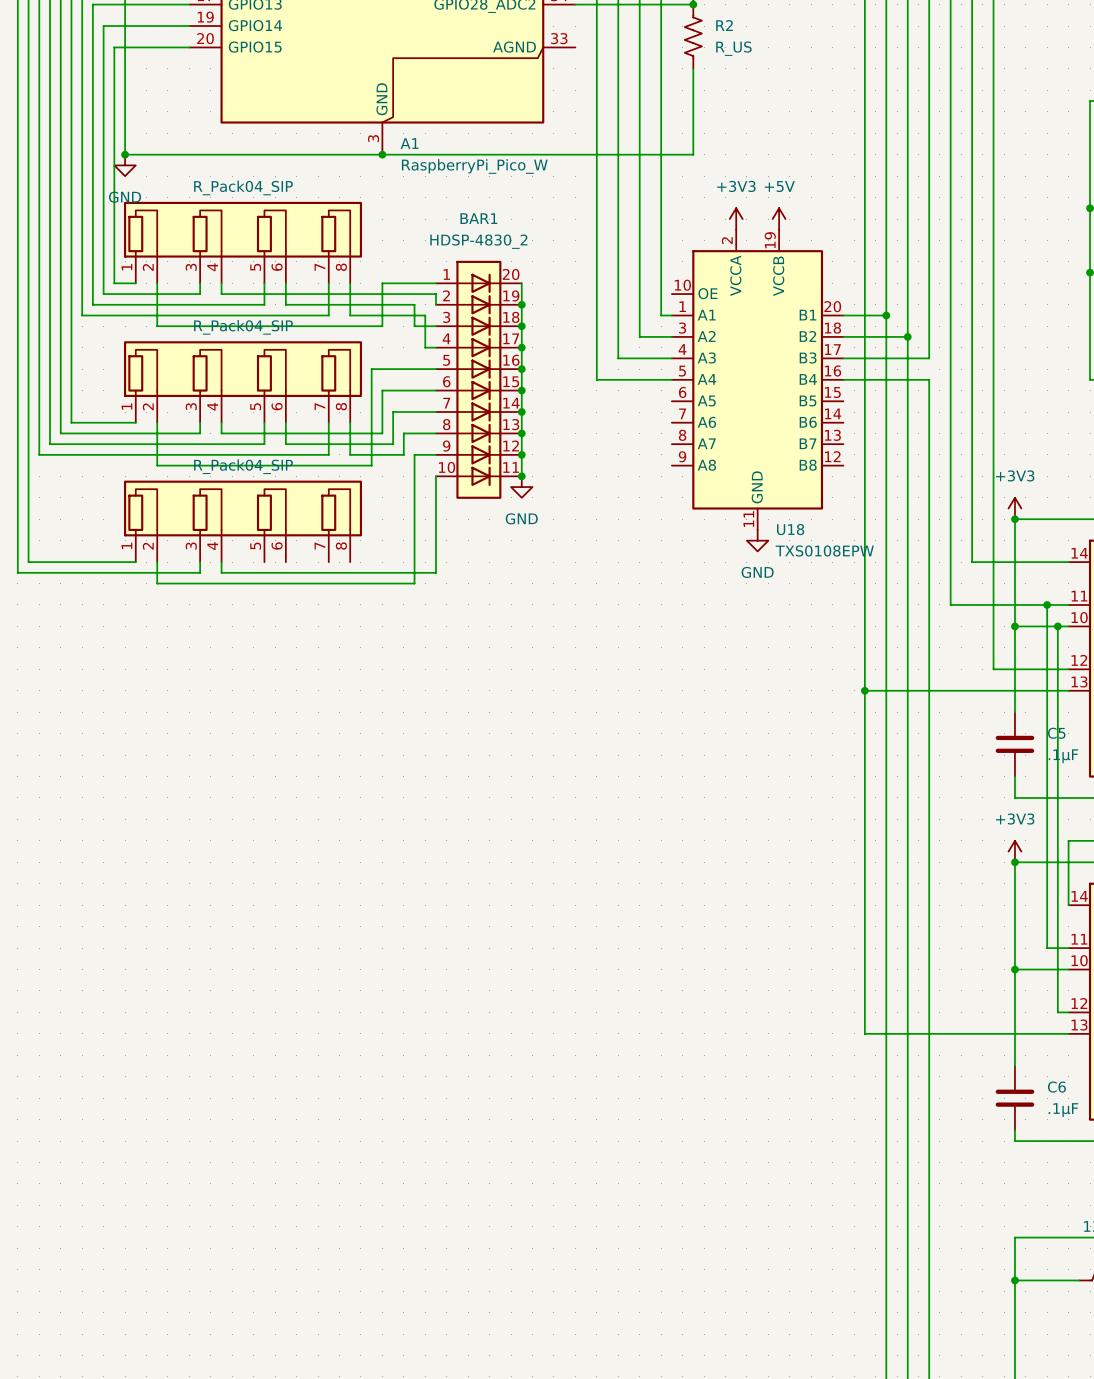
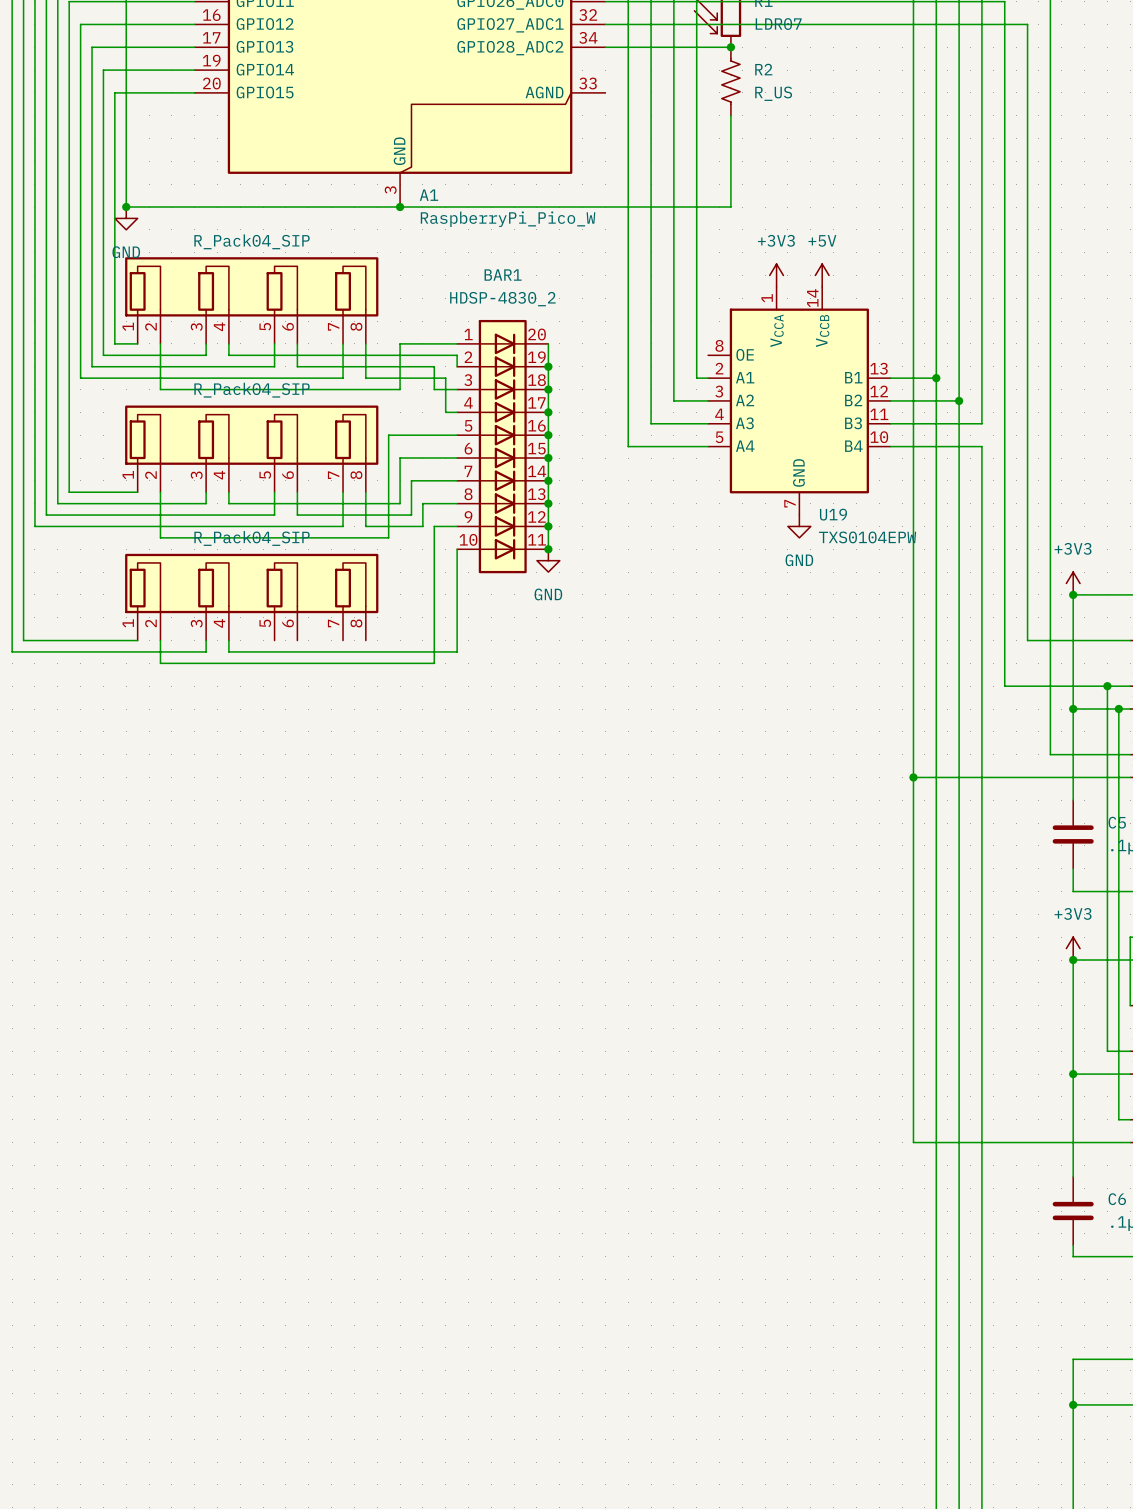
U19: none -> TXS0104EPW (799, 400)
U18: TXS0108EPW (757, 379) -> none
power symbol position: GND (757, 540) -> GND (799, 526)

